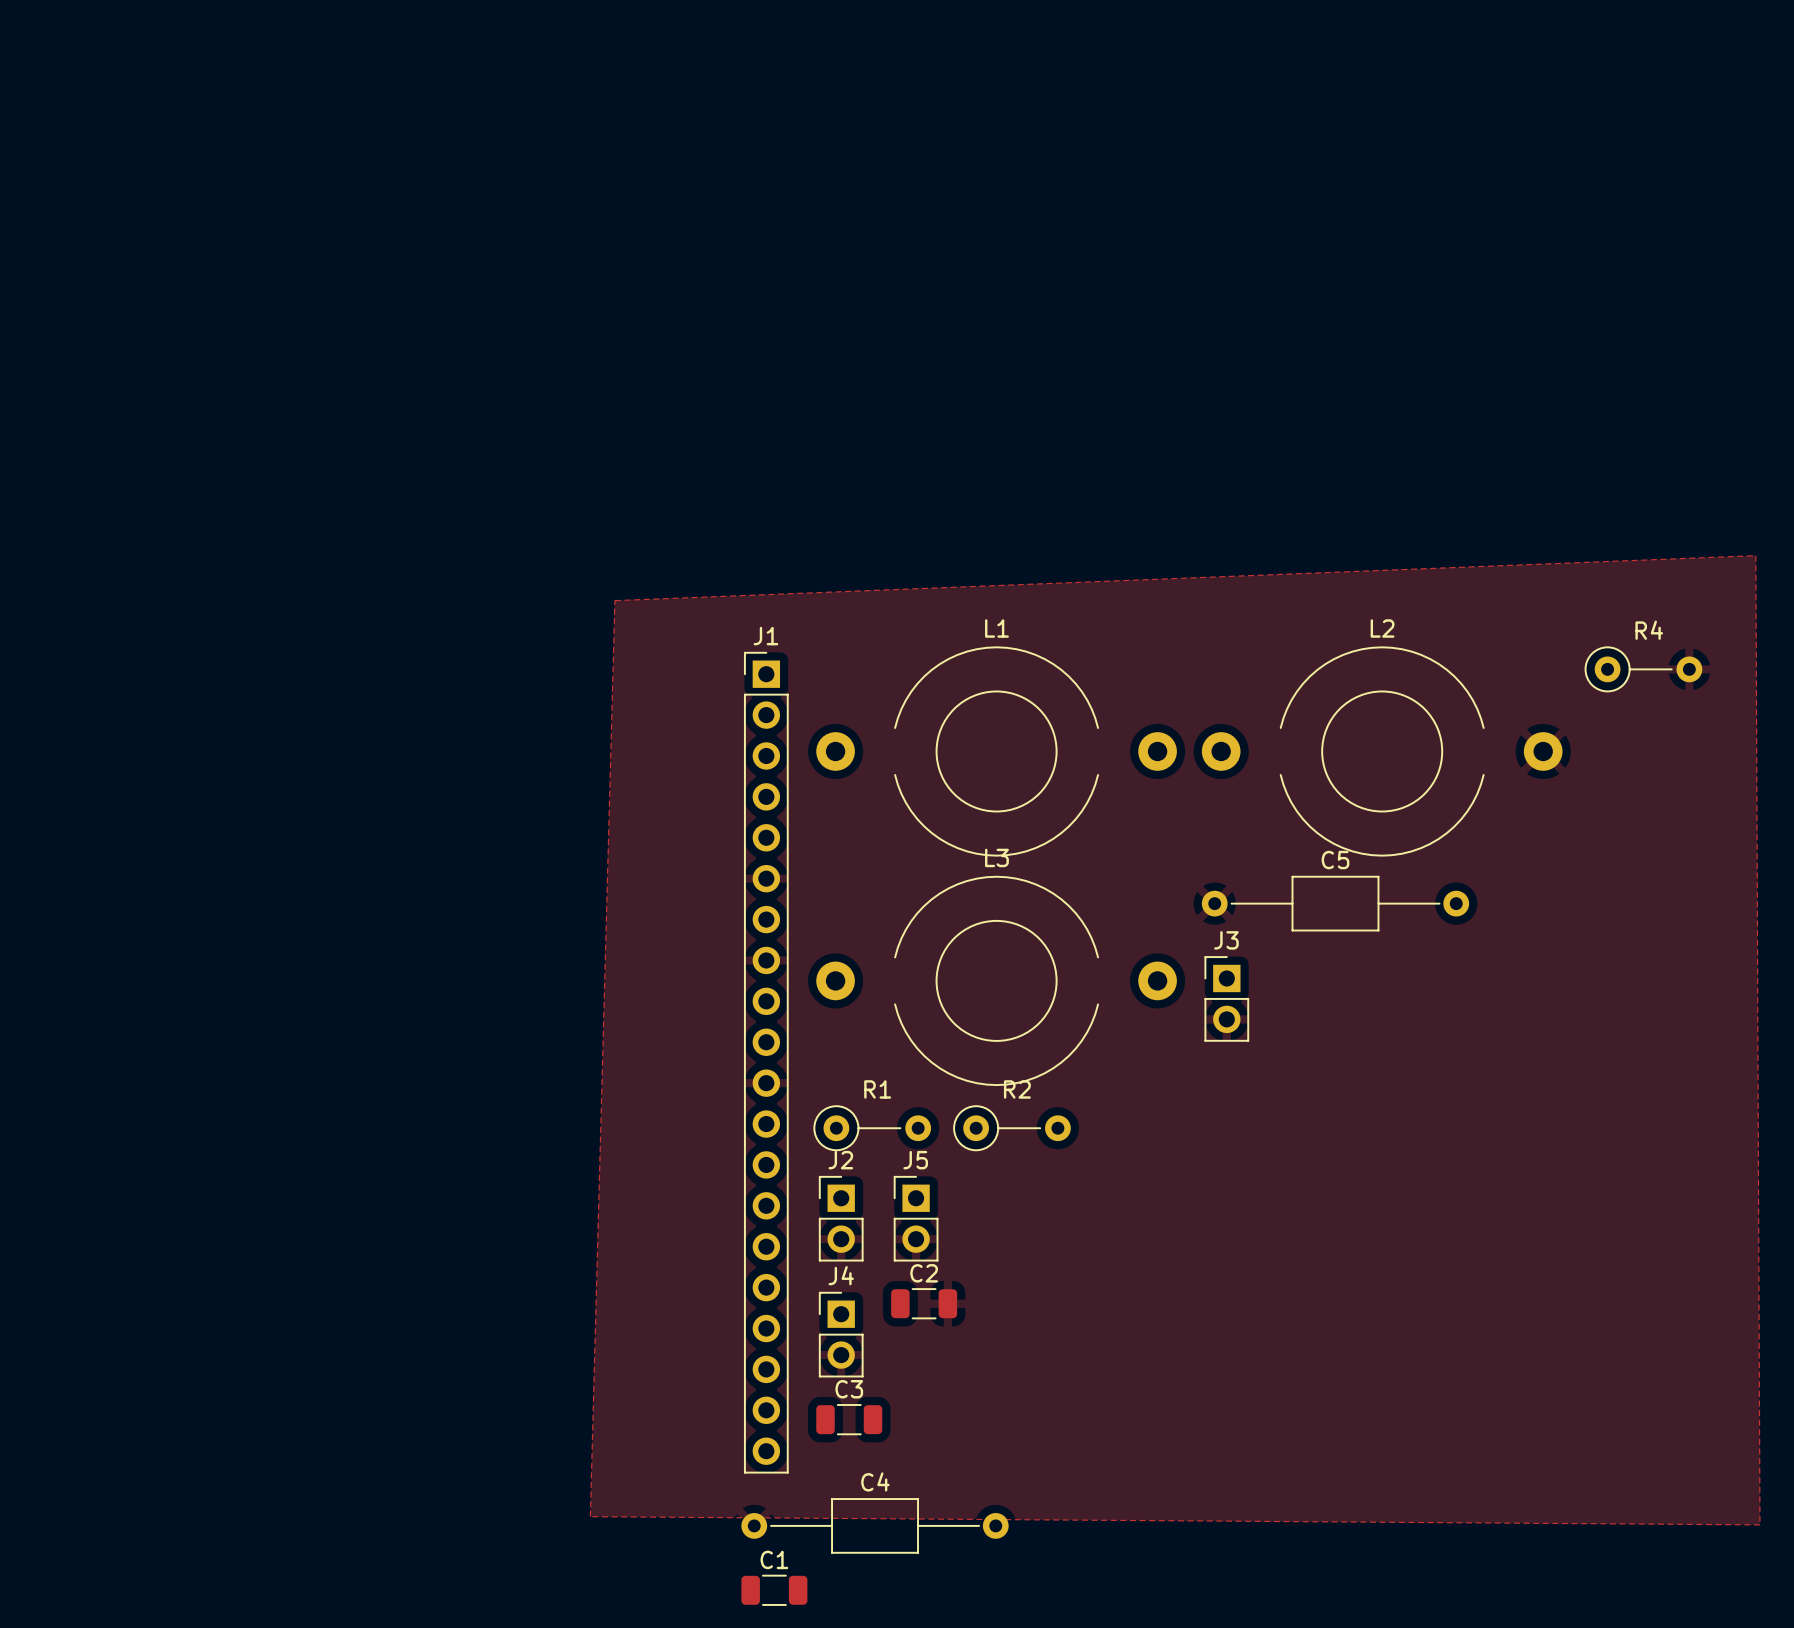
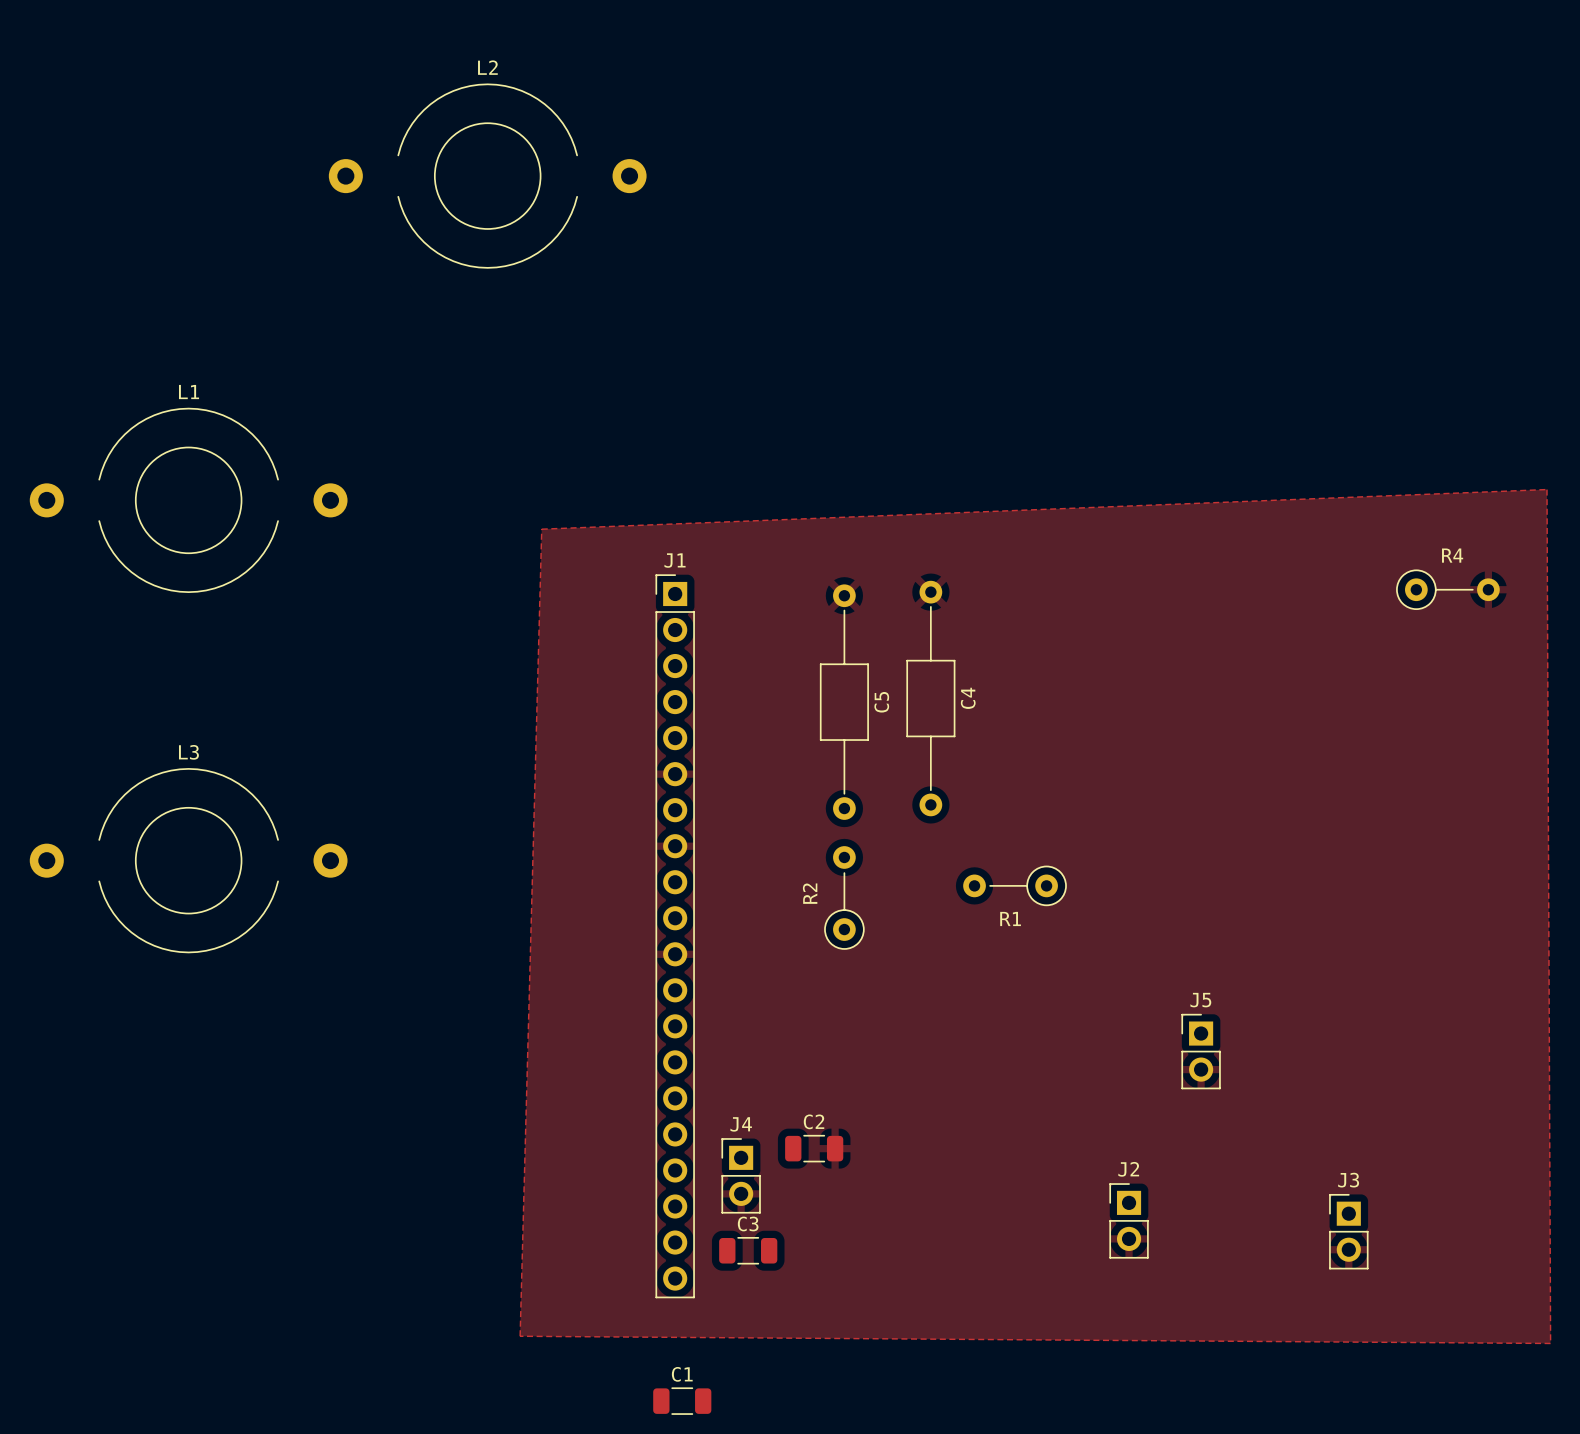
L1 position: (996, 751) -> (188, 500)
L2 position: (1382, 751) -> (487, 176)
C5 rotation: 0° (1335, 903) -> 90° clockwise (844, 702)
C5 position: (1335, 903) -> (844, 702)
L3 position: (996, 980) -> (188, 860)
J3 position: (1226, 998) -> (1348, 1231)
R1 rotation: 0° (872, 1128) -> 180° (1015, 885)
R1 position: (872, 1128) -> (1015, 885)
R2 rotation: 0° (1011, 1128) -> 90° counterclockwise (844, 897)
R2 position: (1011, 1128) -> (844, 897)
J2 position: (841, 1218) -> (1129, 1220)
J5 position: (916, 1218) -> (1201, 1051)
C4 rotation: 0° (875, 1525) -> 90° clockwise (930, 698)
C4 position: (875, 1525) -> (930, 698)

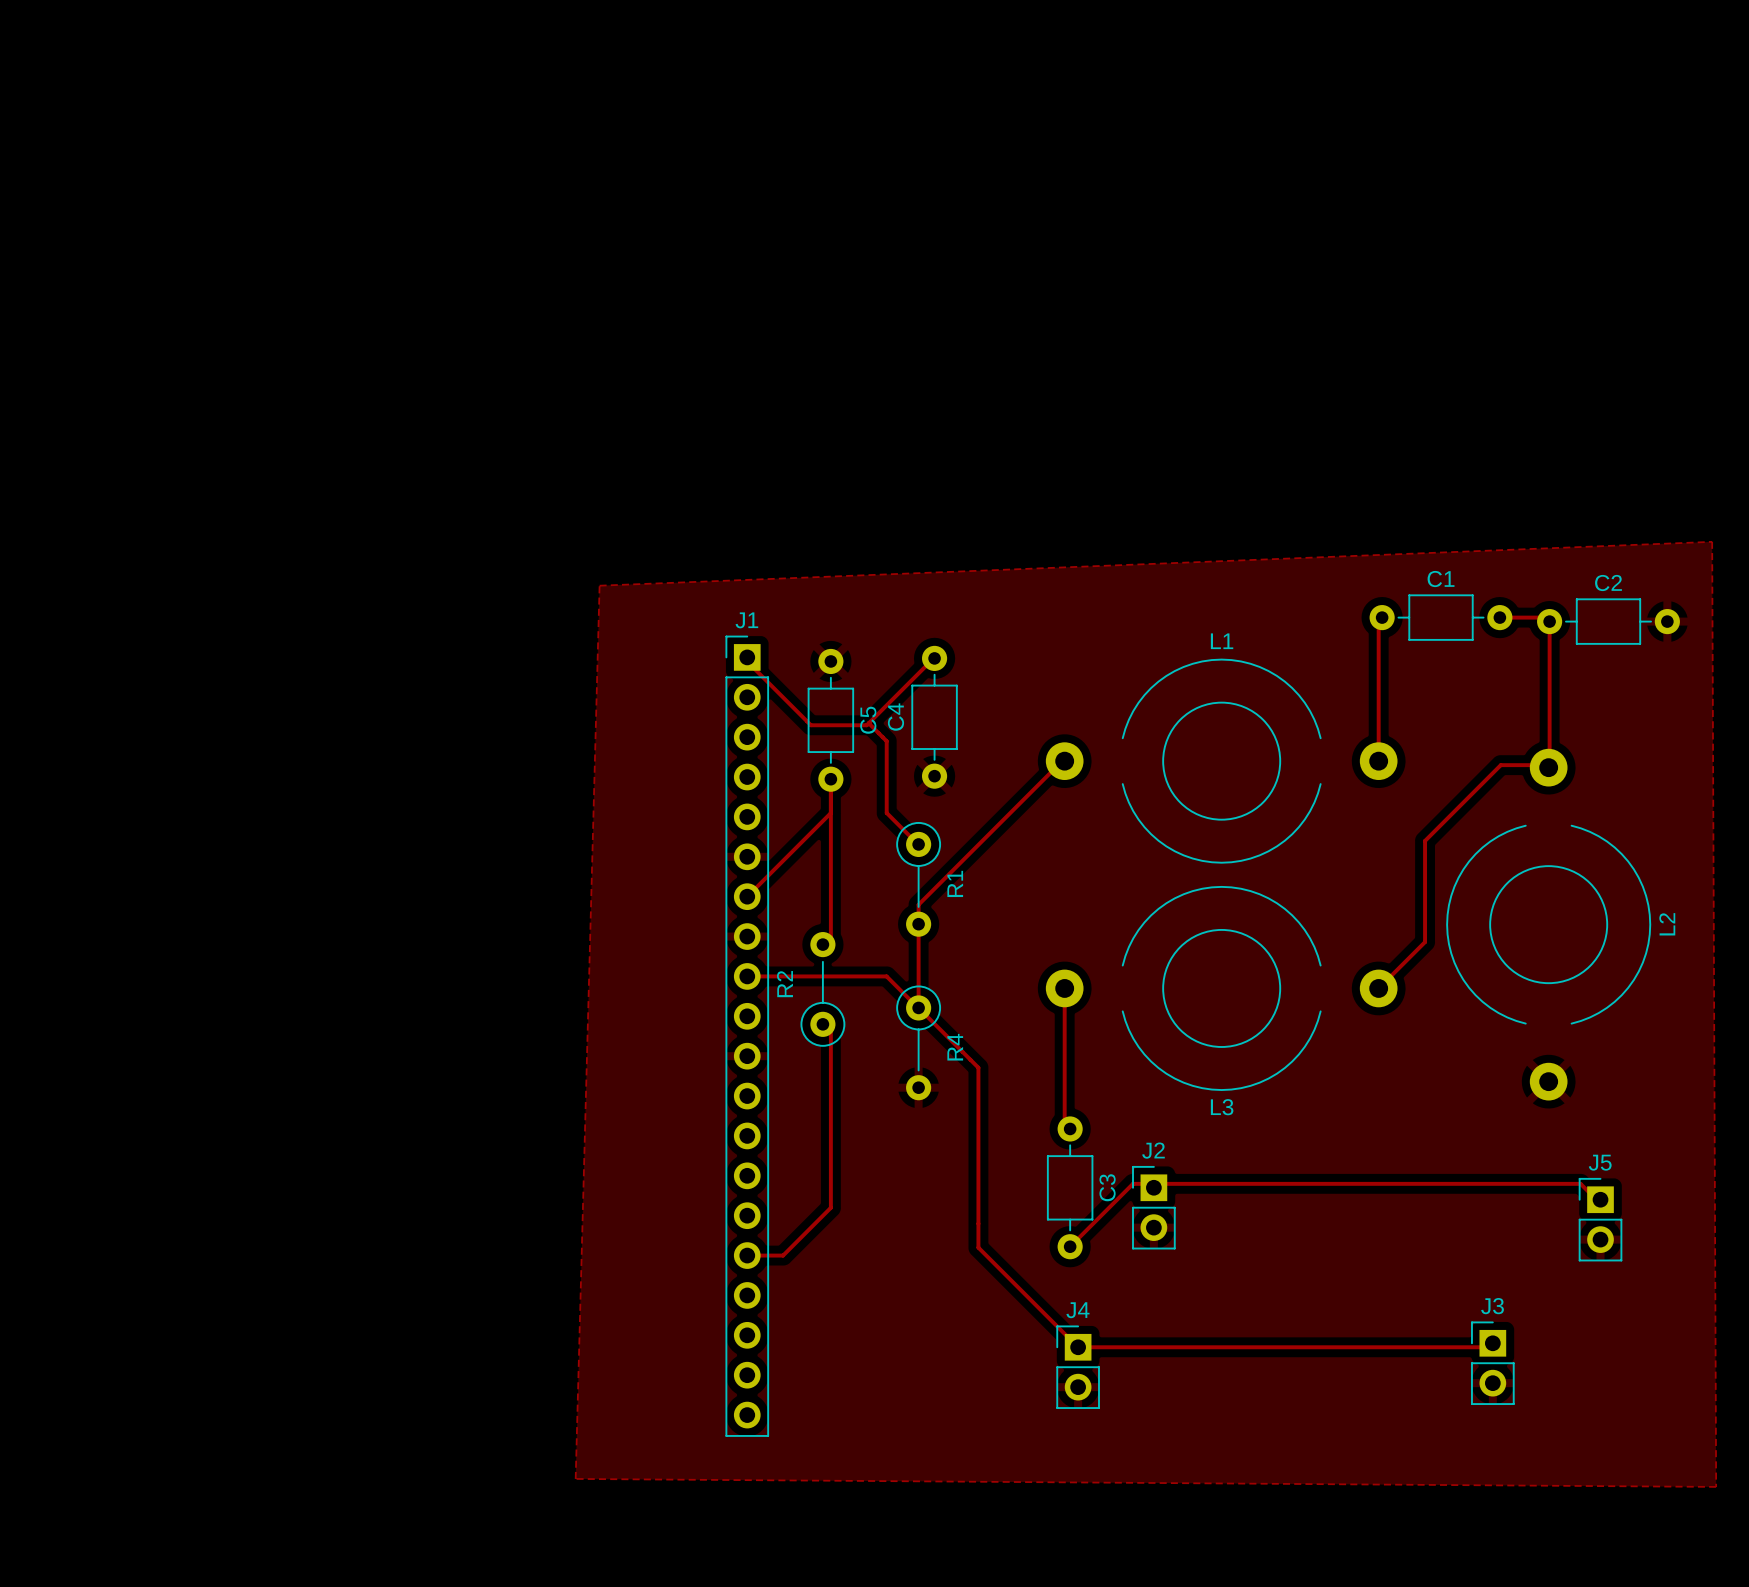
L2 rotation: 0° (487, 176) -> 90° clockwise (1548, 924)
L2 position: (487, 176) -> (1548, 924)
L1 position: (188, 500) -> (1221, 761)
track: none -> (1381, 613) (1378, 616) (1378, 761)
track: none -> (1499, 617) (1548, 617) (1552, 621)
track: none -> (1549, 621) (1549, 762) (1552, 765)
C4 footprint: [906, 580, 956, 817] -> [911, 645, 958, 789]
C5 footprint: [819, 584, 869, 820] -> [807, 648, 855, 792]
R4 rotation: 0° (1447, 589) -> 90° clockwise (918, 1042)
R4 position: (1447, 589) -> (918, 1042)
track: none -> (747, 657) (747, 661) (810, 725) (866, 725) (934, 657)
track: none -> (868, 723) (886, 741) (886, 813) (918, 844)
track: none -> (1066, 757) (918, 904) (918, 1007) (978, 1067) (978, 1247) (1078, 1347)
track: none -> (1548, 765) (1500, 765) (1425, 840) (1425, 942) (1378, 988)
C4 name position: C4 (968, 698) -> C4 (895, 717)
track: none -> (830, 777) (830, 936) (822, 944)
track: none -> (830, 813) (747, 896)
L3 name position: L3 (188, 752) -> L3 (1222, 1107)
L3 position: (188, 860) -> (1221, 988)
track: none -> (747, 976) (886, 976) (918, 1008)
R1 rotation: 0° (1015, 885) -> 90° counterclockwise (918, 879)
R1 position: (1015, 885) -> (918, 879)
track: none -> (1064, 988) (1064, 1122) (1070, 1128)
R2 position: (844, 897) -> (822, 989)
track: none -> (822, 1020) (830, 1028) (830, 1207) (783, 1255) (747, 1255)
J5 position: (1201, 1051) -> (1600, 1219)
track: none -> (1596, 1199) (1580, 1183) (1133, 1183) (1070, 1246)
C2 footprint: [785, 1134, 844, 1163] -> [1537, 598, 1680, 645]
J4 position: (741, 1175) -> (1078, 1367)
track: none -> (1492, 1339) (1484, 1347) (1078, 1347)
J2 position: (1129, 1220) -> (1153, 1207)
C3 name position: C3 (748, 1224) -> C3 (1107, 1187)
C3 footprint: [719, 1237, 778, 1265] -> [1046, 1116, 1094, 1260]
C1 footprint: [653, 1387, 712, 1415] -> [1369, 594, 1513, 641]

